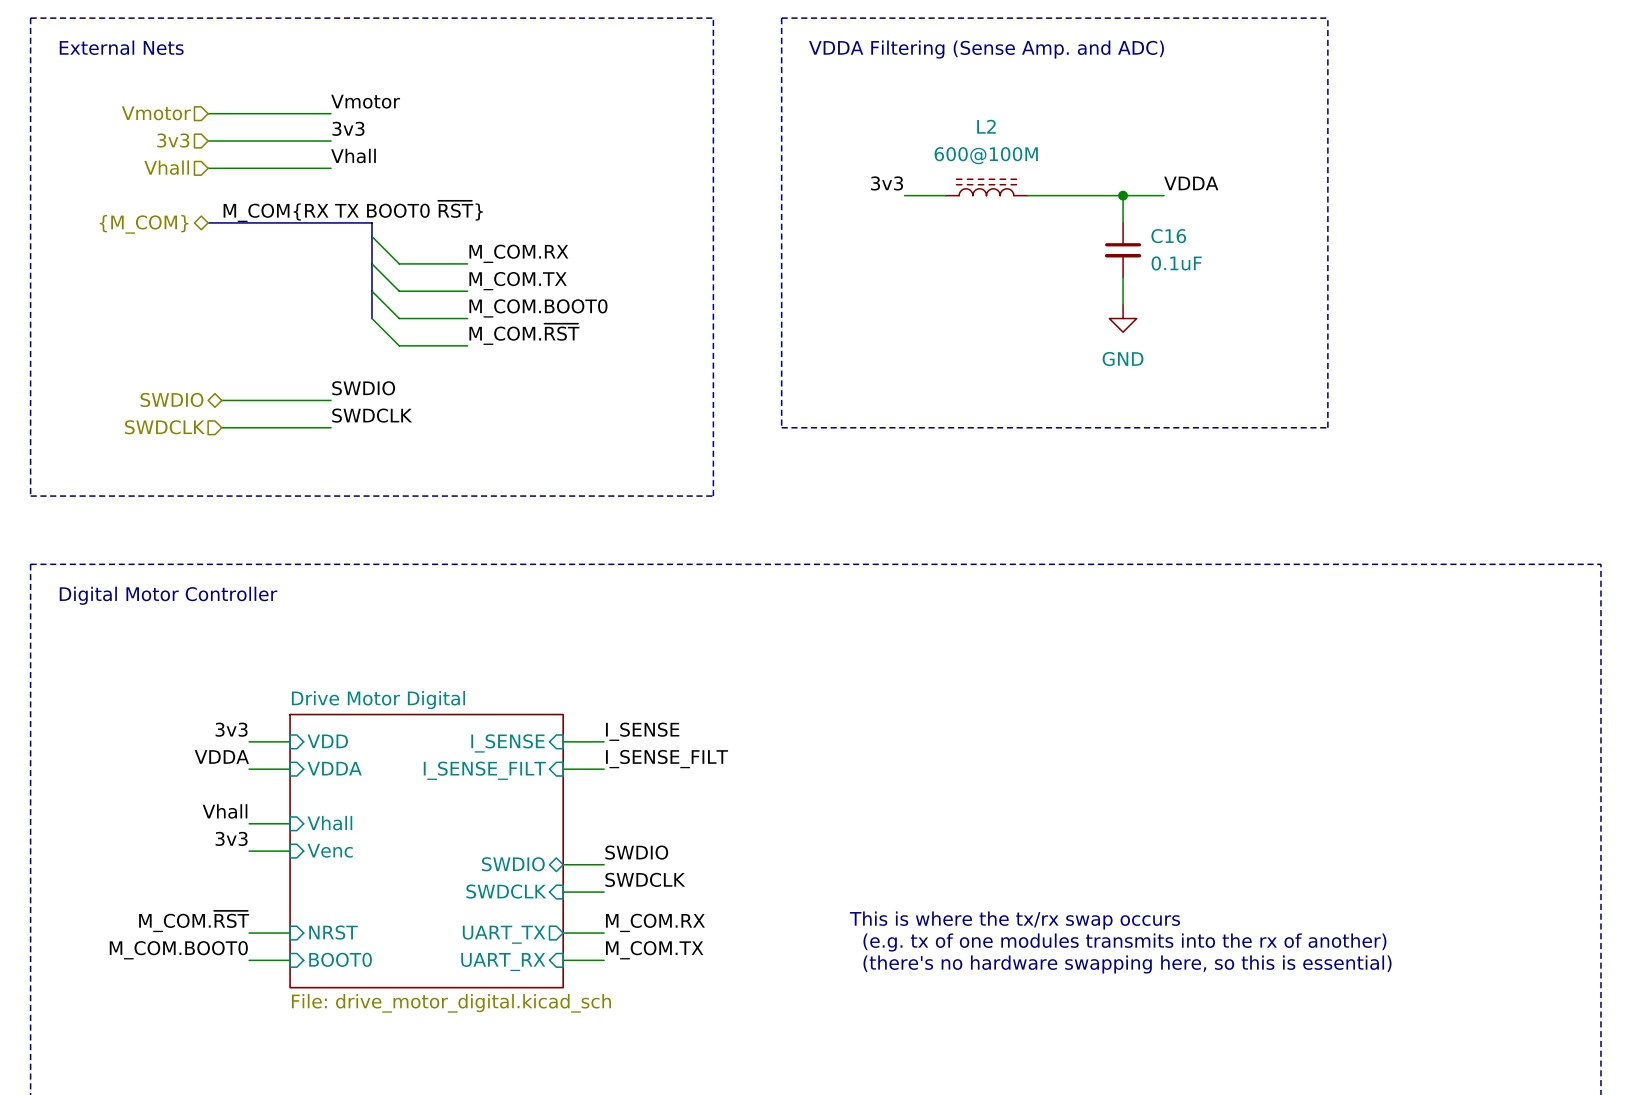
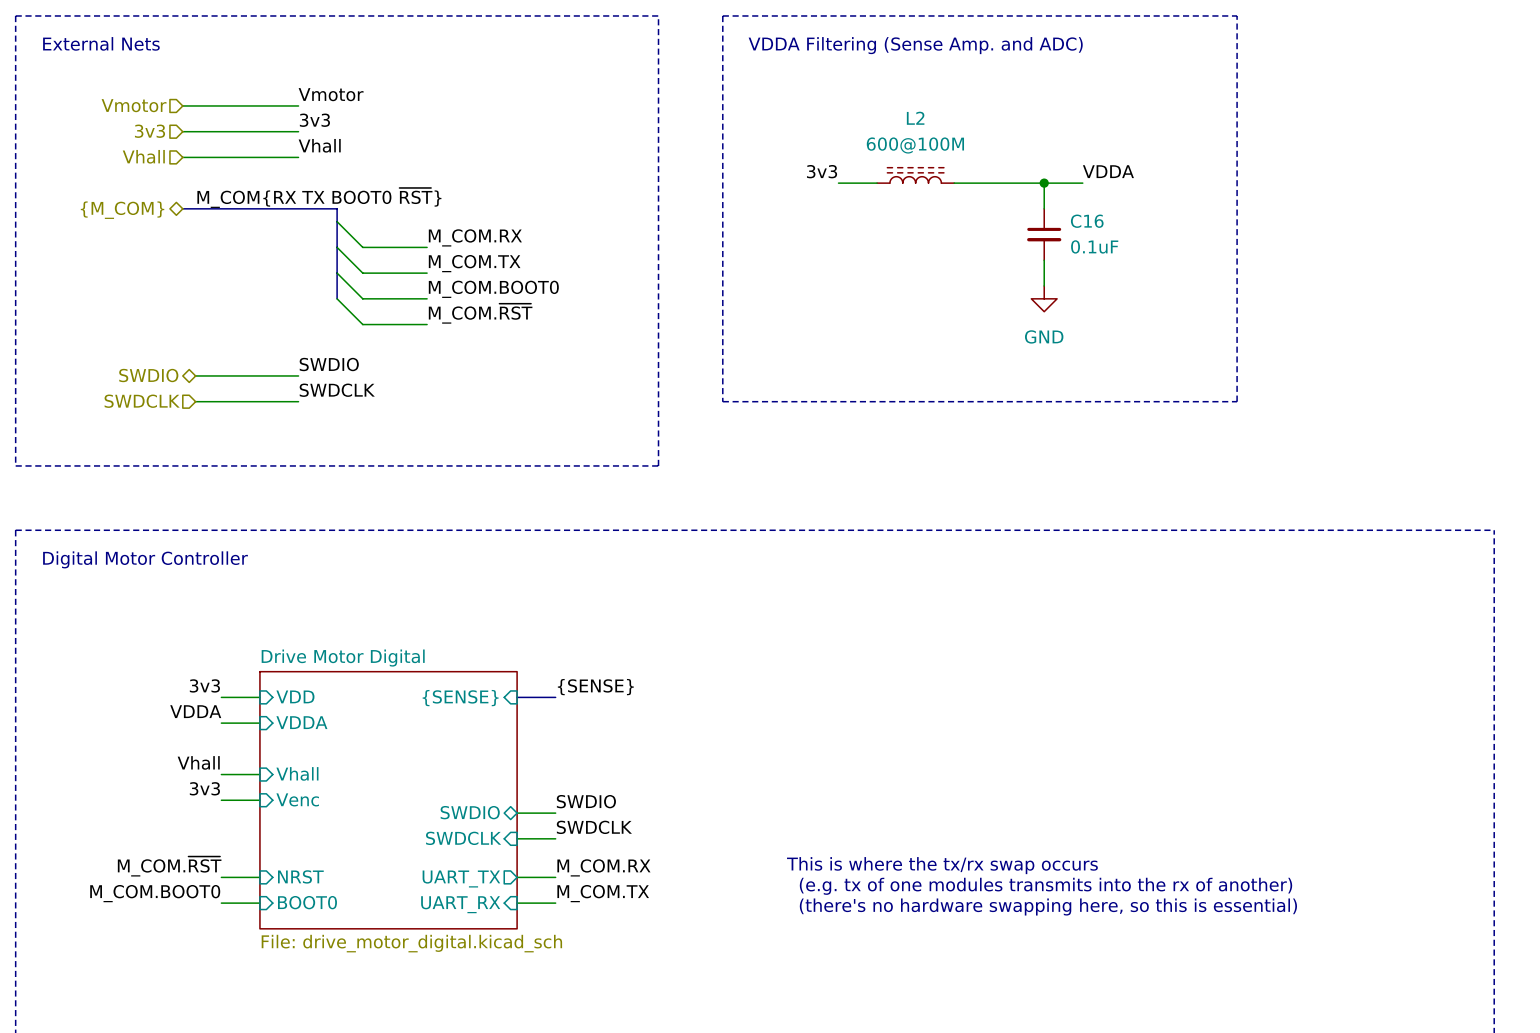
label: I_SENSE (642, 731) -> {SENSE} (595, 687)
bus: none -> (517, 697) (555, 697)
sheet pin: I_SENSE (507, 743) -> {SENSE} (460, 698)
label: I_SENSE_FILT (667, 759) -> none
wire: (563, 769) (604, 769) -> none
sheet pin: I_SENSE_FILT (484, 770) -> none

